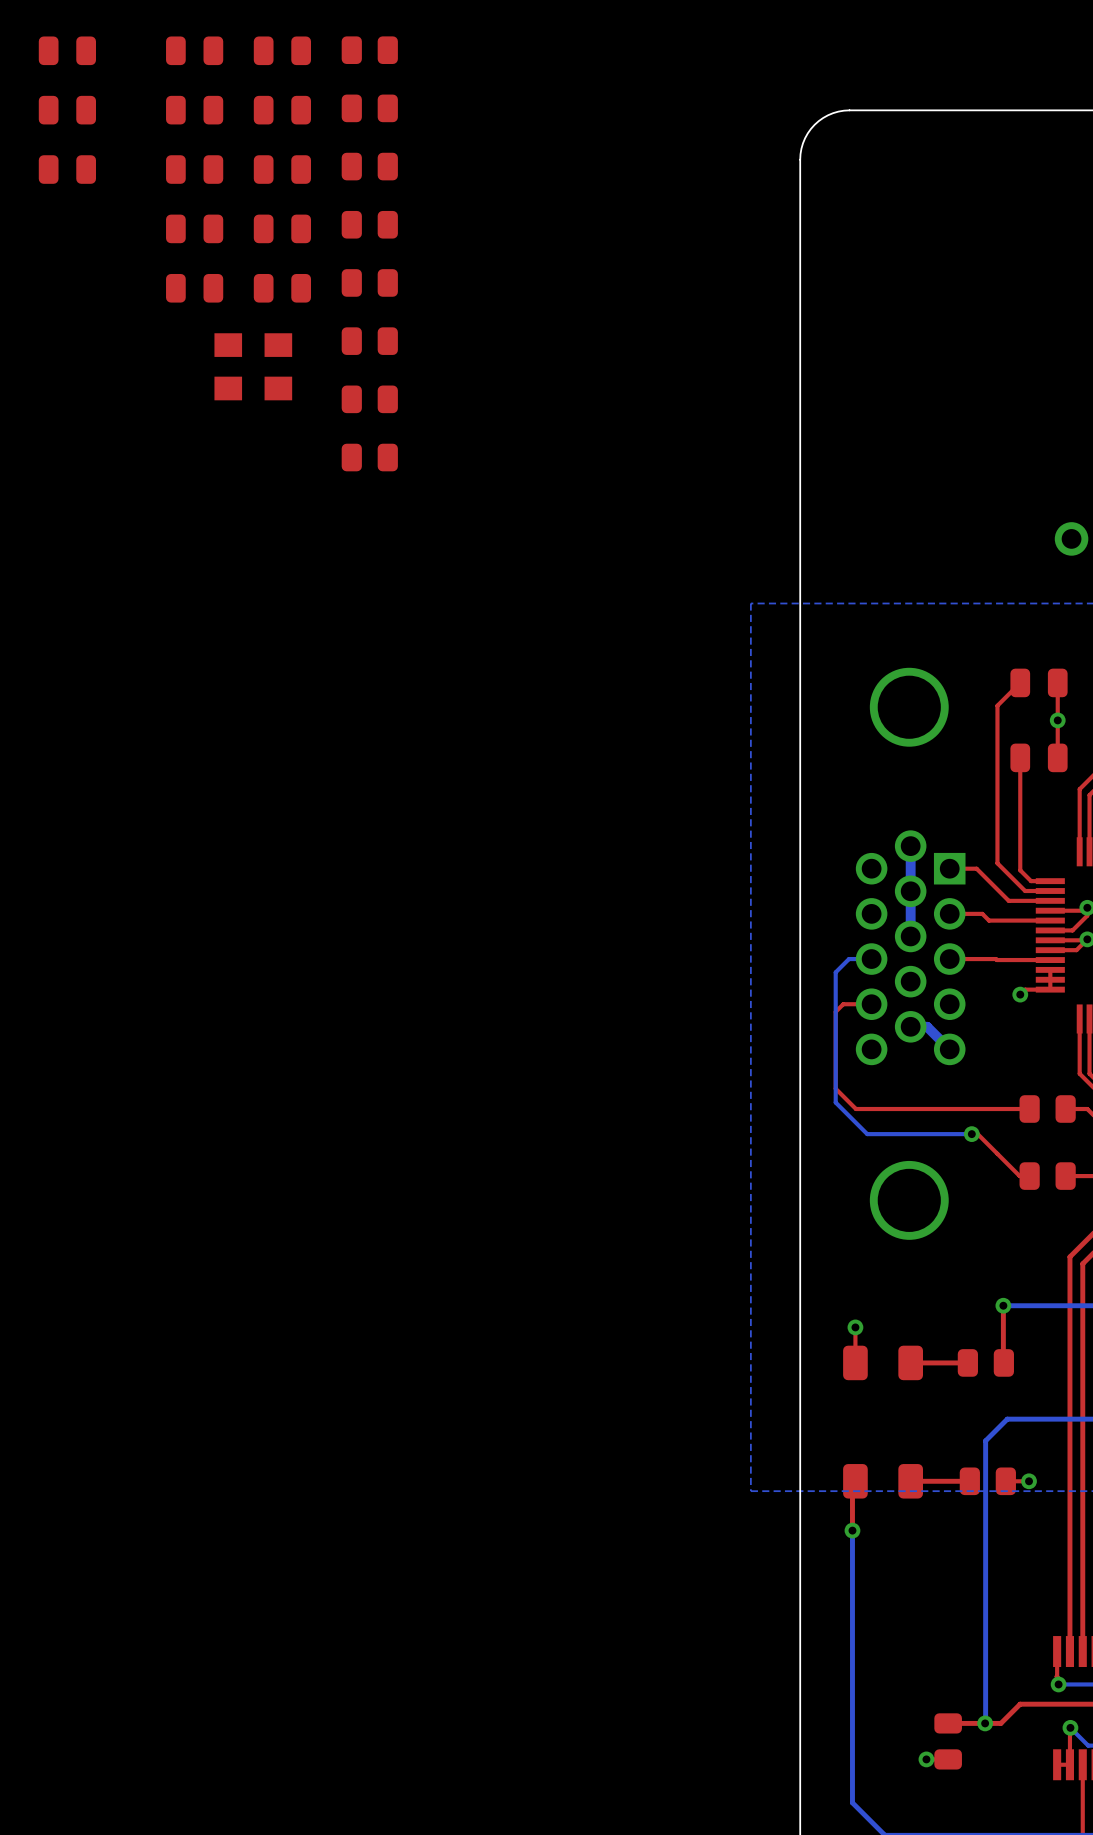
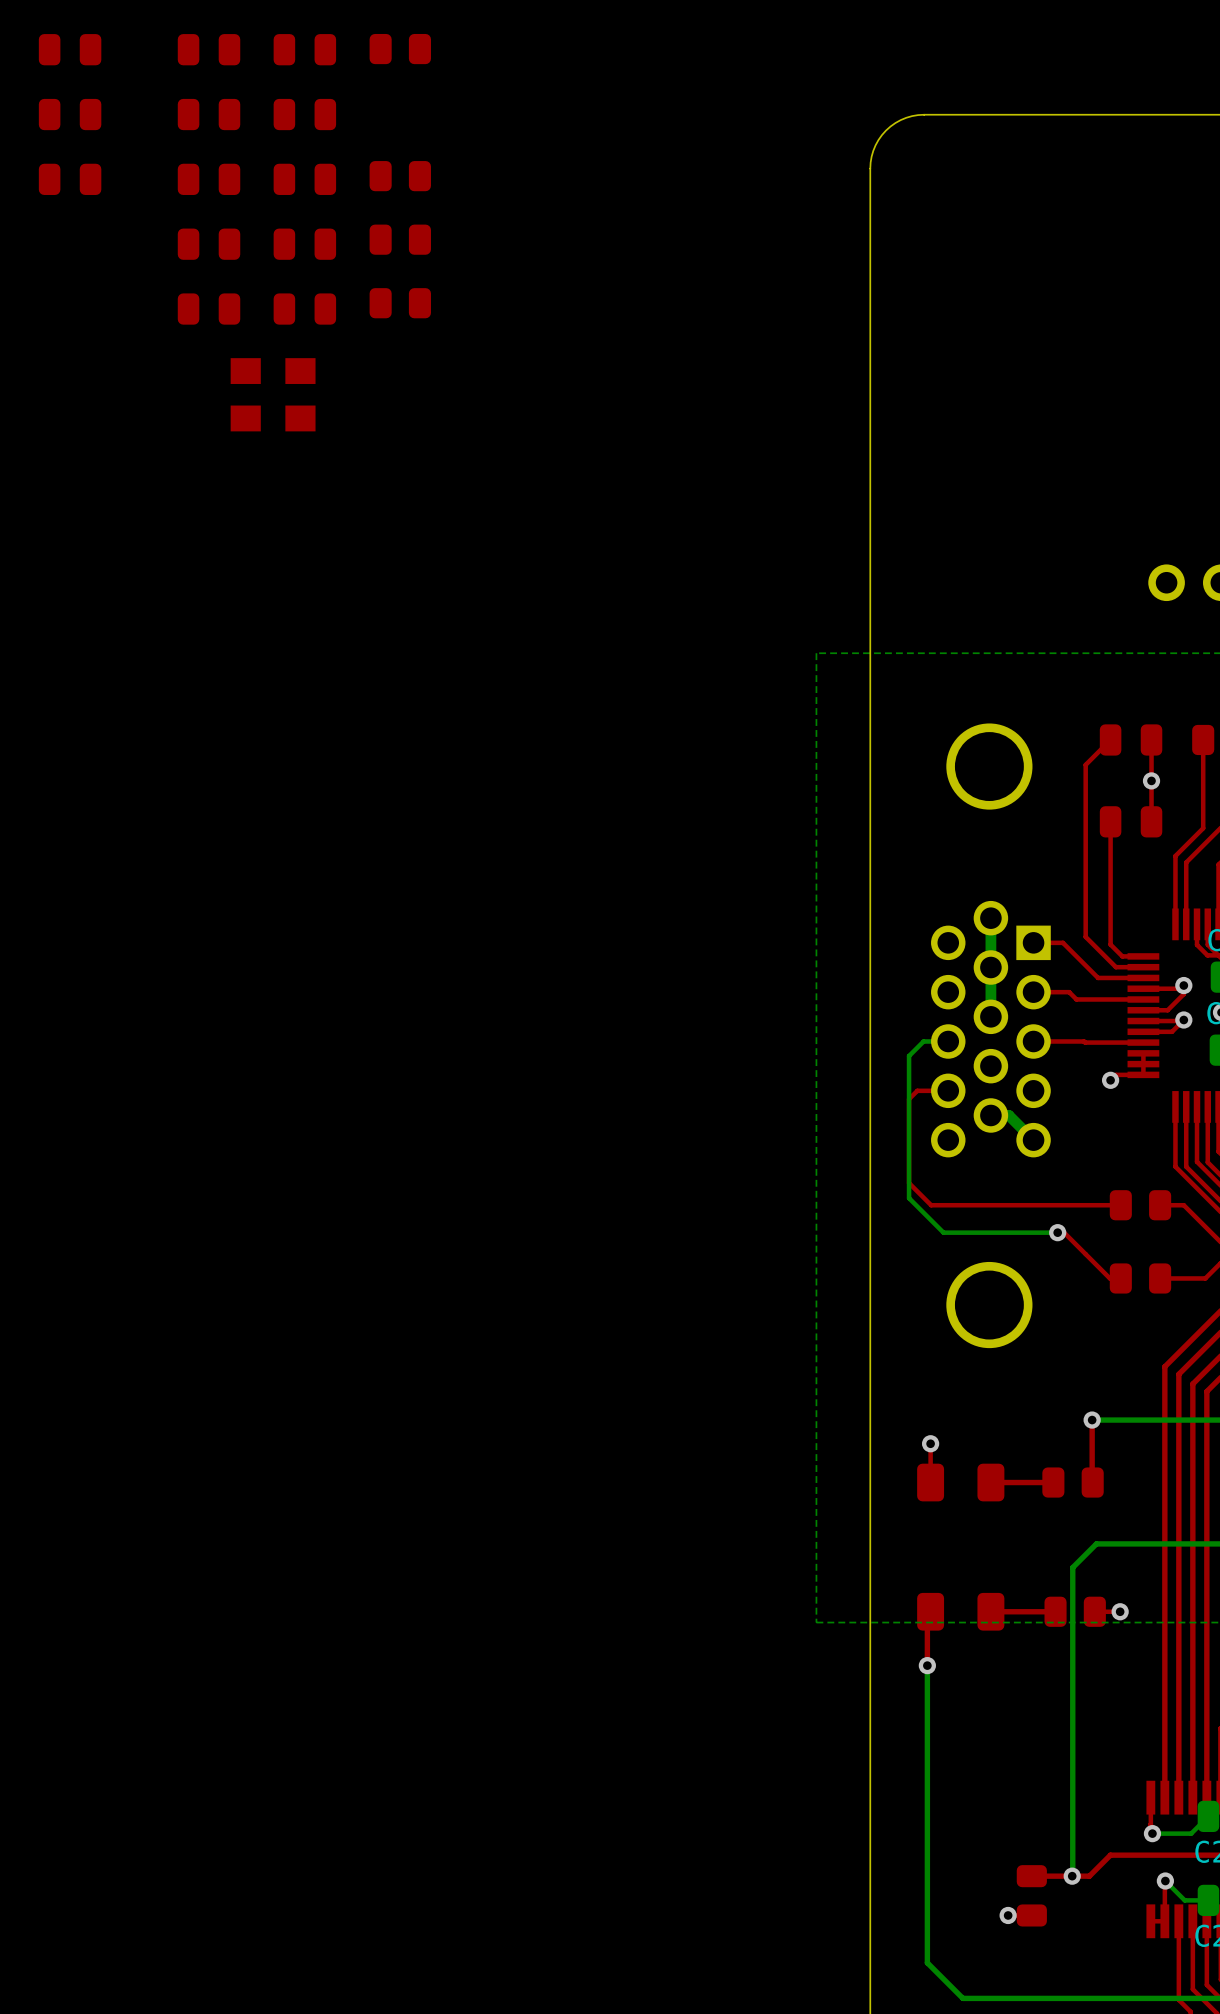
part: (369, 108) -> none
part: (369, 341) -> none
part: (369, 399) -> none
part: (369, 457) -> none

